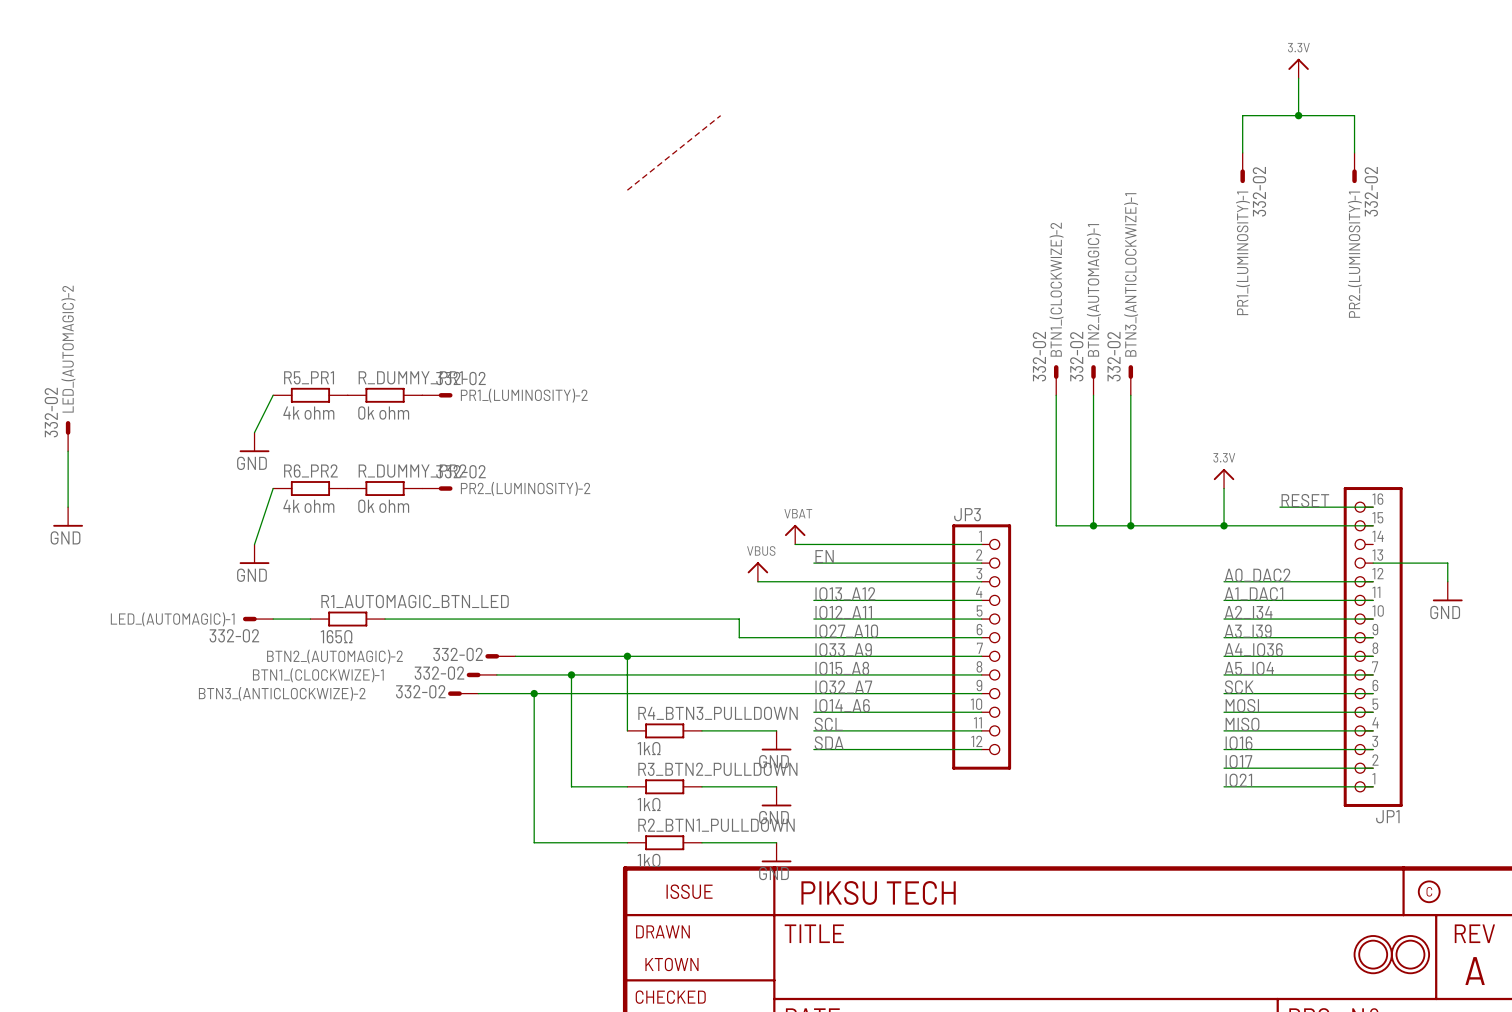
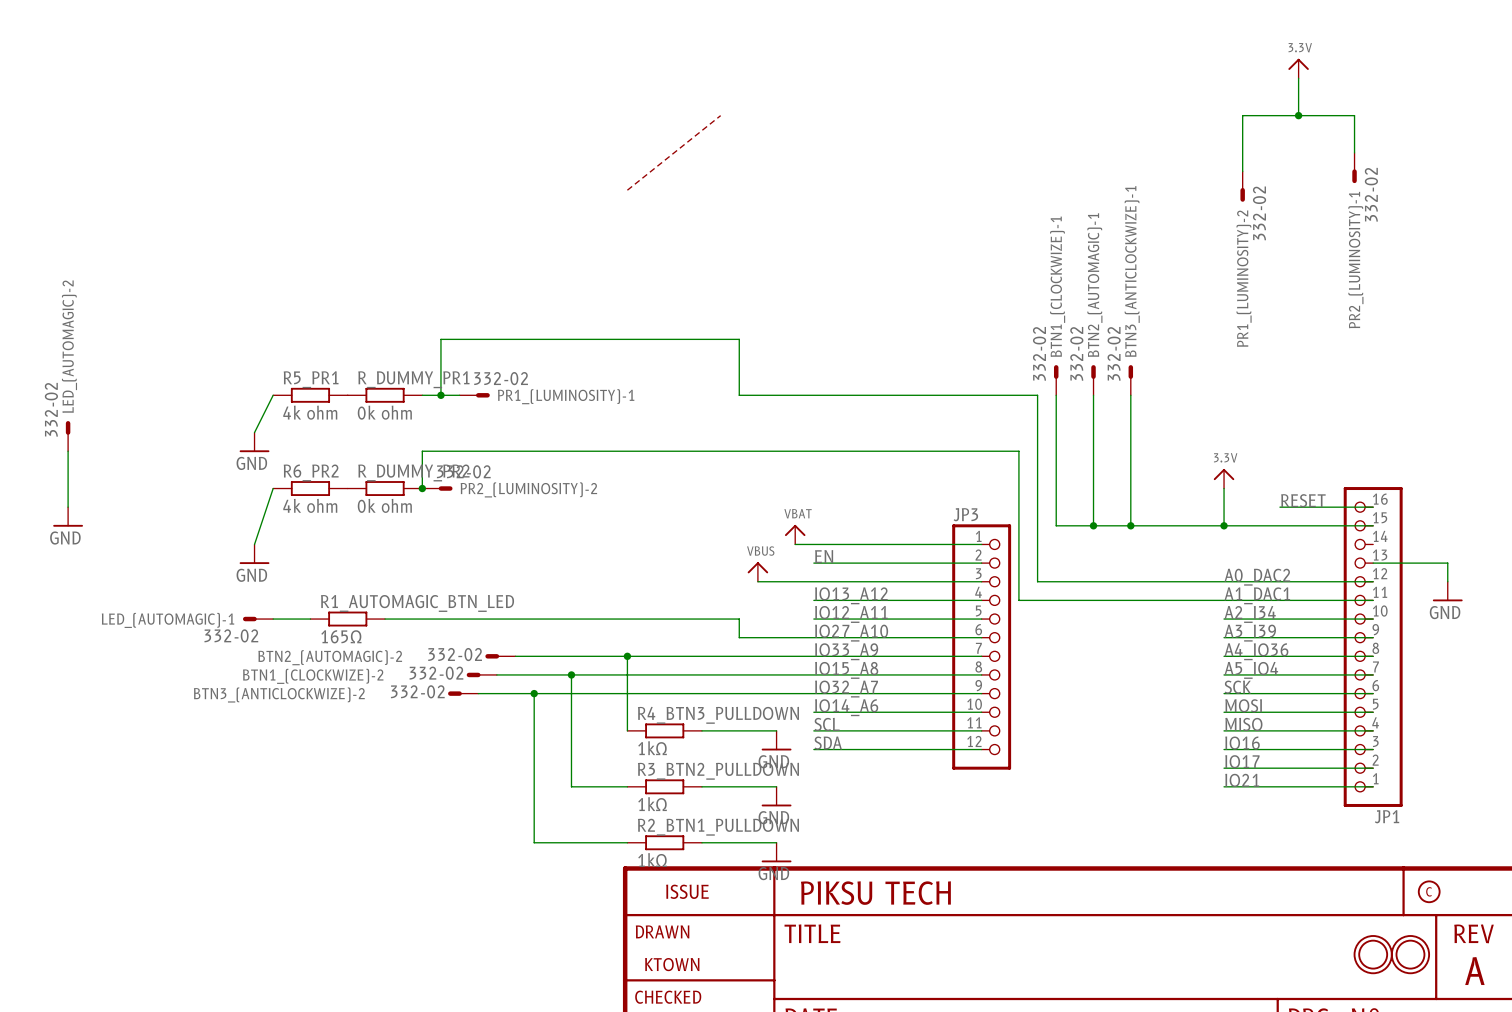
PR1_(LUMINOSITY)-1 position: (1242, 168) -> (474, 395)
PR1_(LUMINOSITY)-1 rotation: 0° (1242, 176) -> 90° counterclockwise (482, 395)
BTN1_(CLOCKWIZE)-2 name: BTN1_(CLOCKWIZE)-2 (1056, 289) -> BTN1_(CLOCKWIZE)-1 (1057, 286)
PR1_(LUMINOSITY)-2 position: (437, 395) -> (1242, 186)
wire: none -> (440, 395) (440, 339) (739, 339) (739, 395) (1037, 395) (1037, 581) (1224, 581)
junction: none -> (440, 395)
PR1_(LUMINOSITY)-2 rotation: 0° (445, 395) -> 90° clockwise (1242, 194)
wire: none -> (422, 488) (422, 451) (1018, 451) (1018, 600) (1224, 600)
junction: none -> (422, 488)
BTN1_(CLOCKWIZE)-1 name: BTN1_(CLOCKWIZE)-1 (318, 675) -> BTN1_(CLOCKWIZE)-2 (313, 676)

